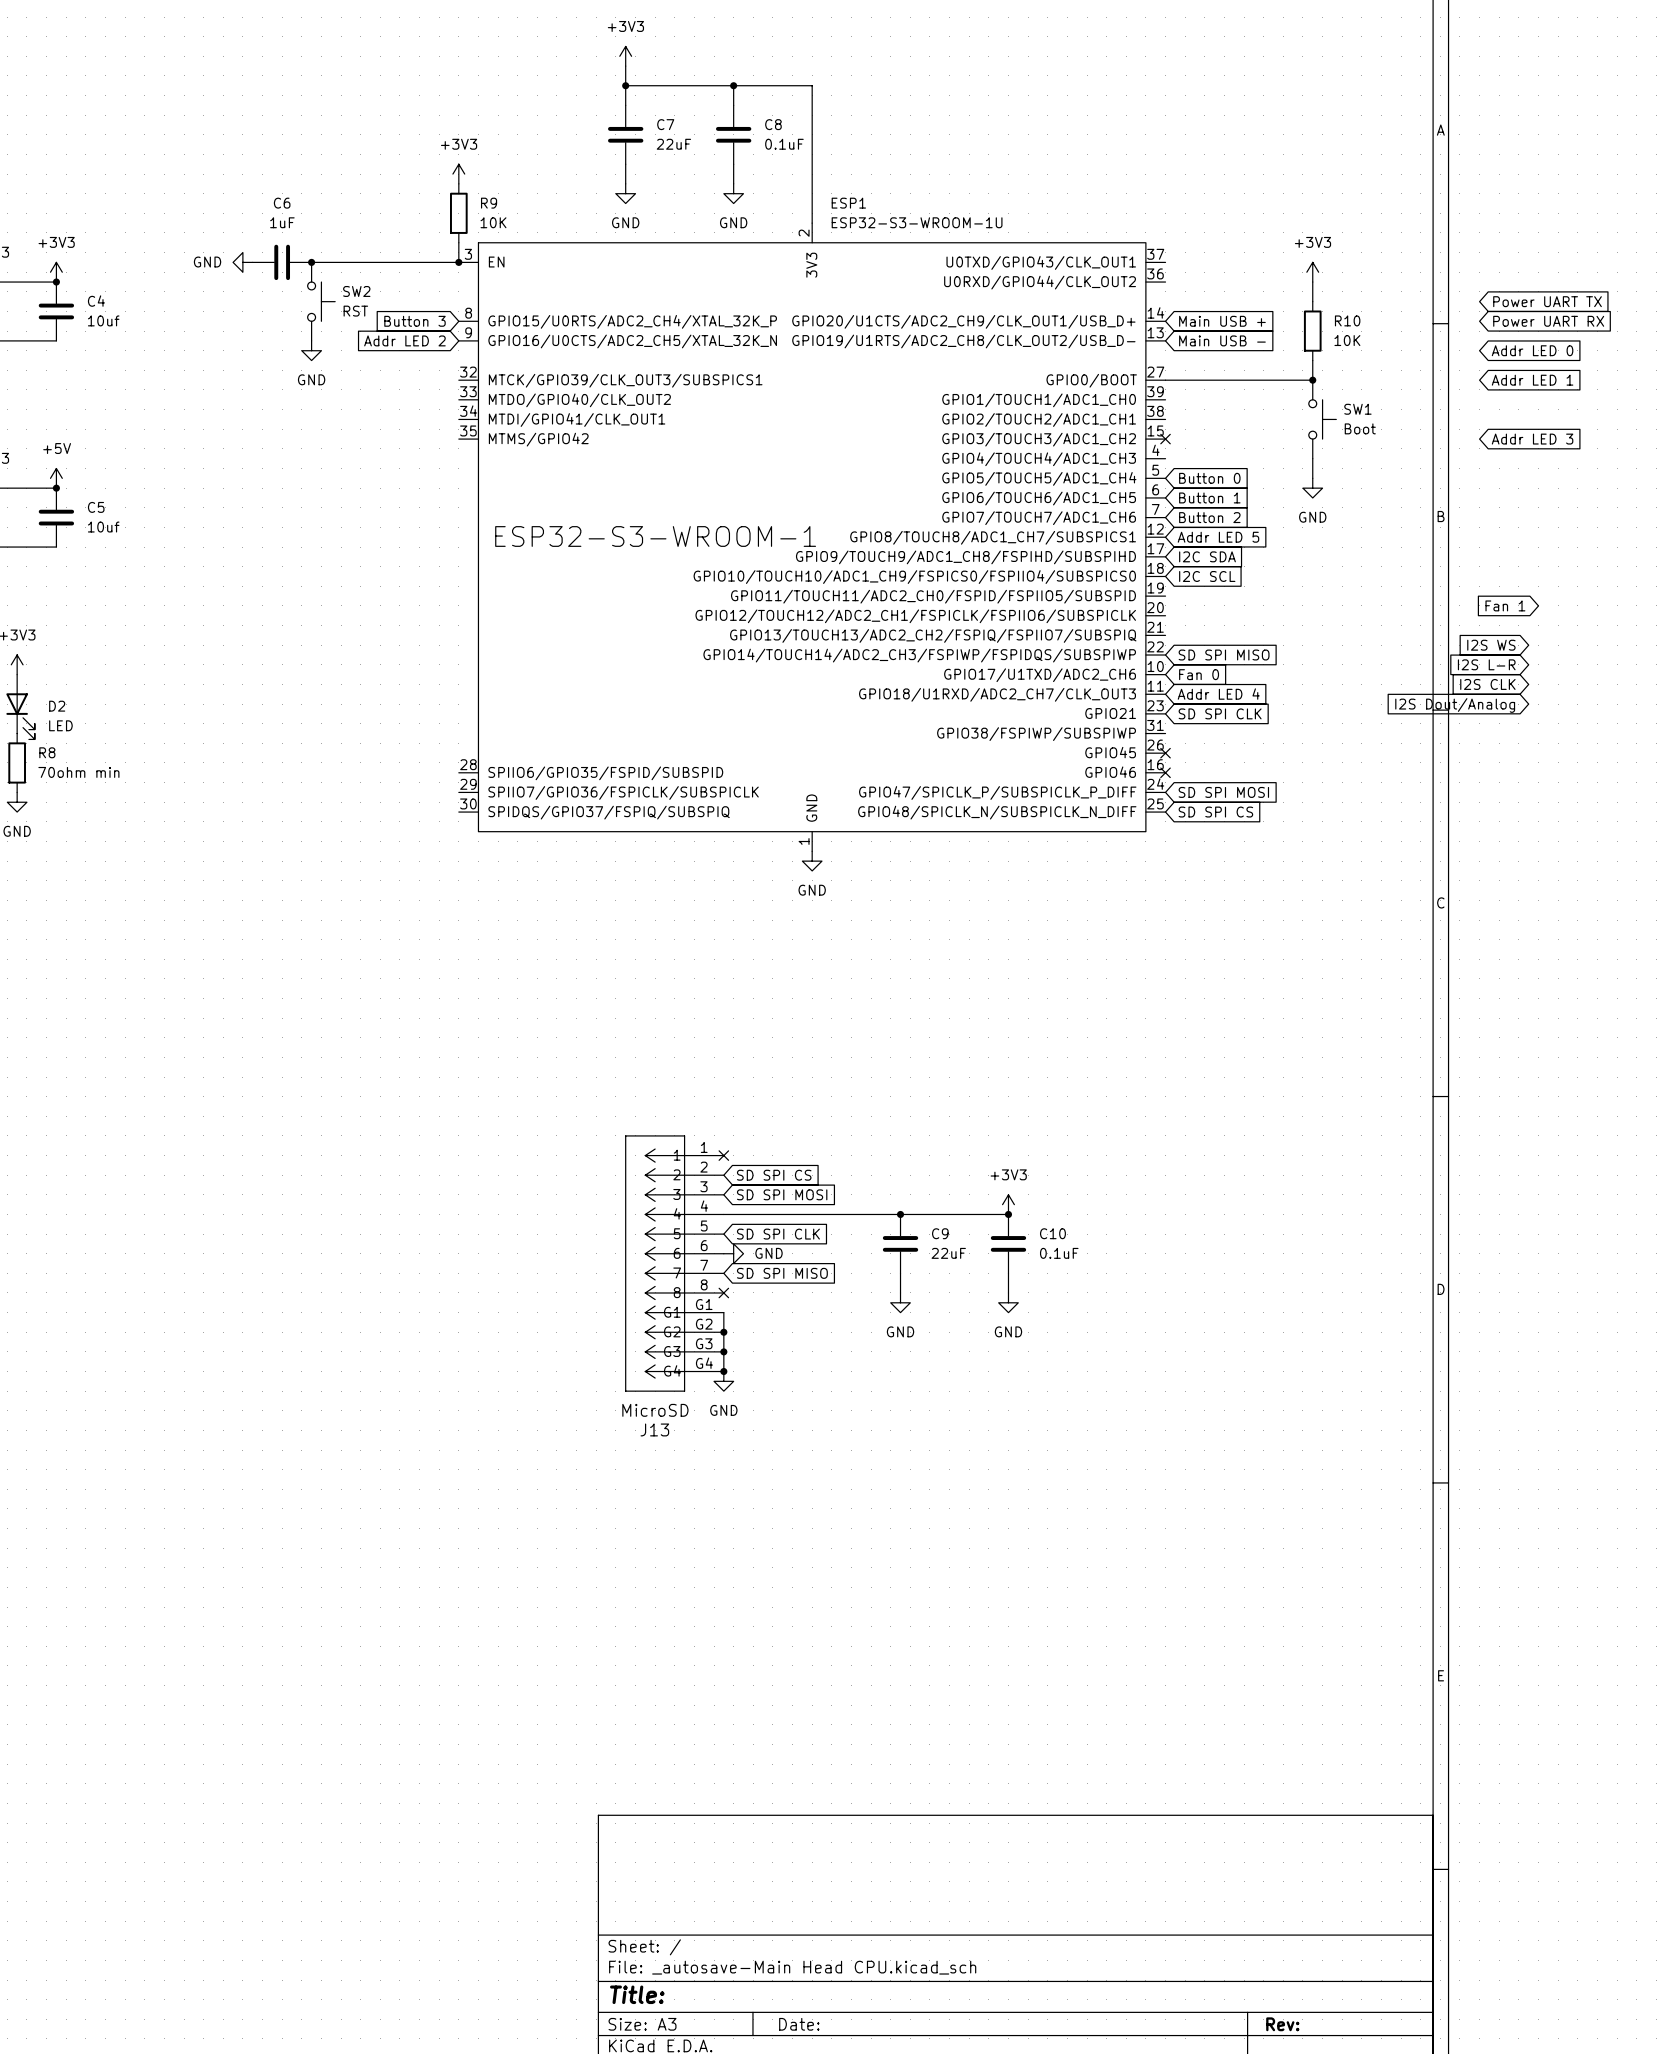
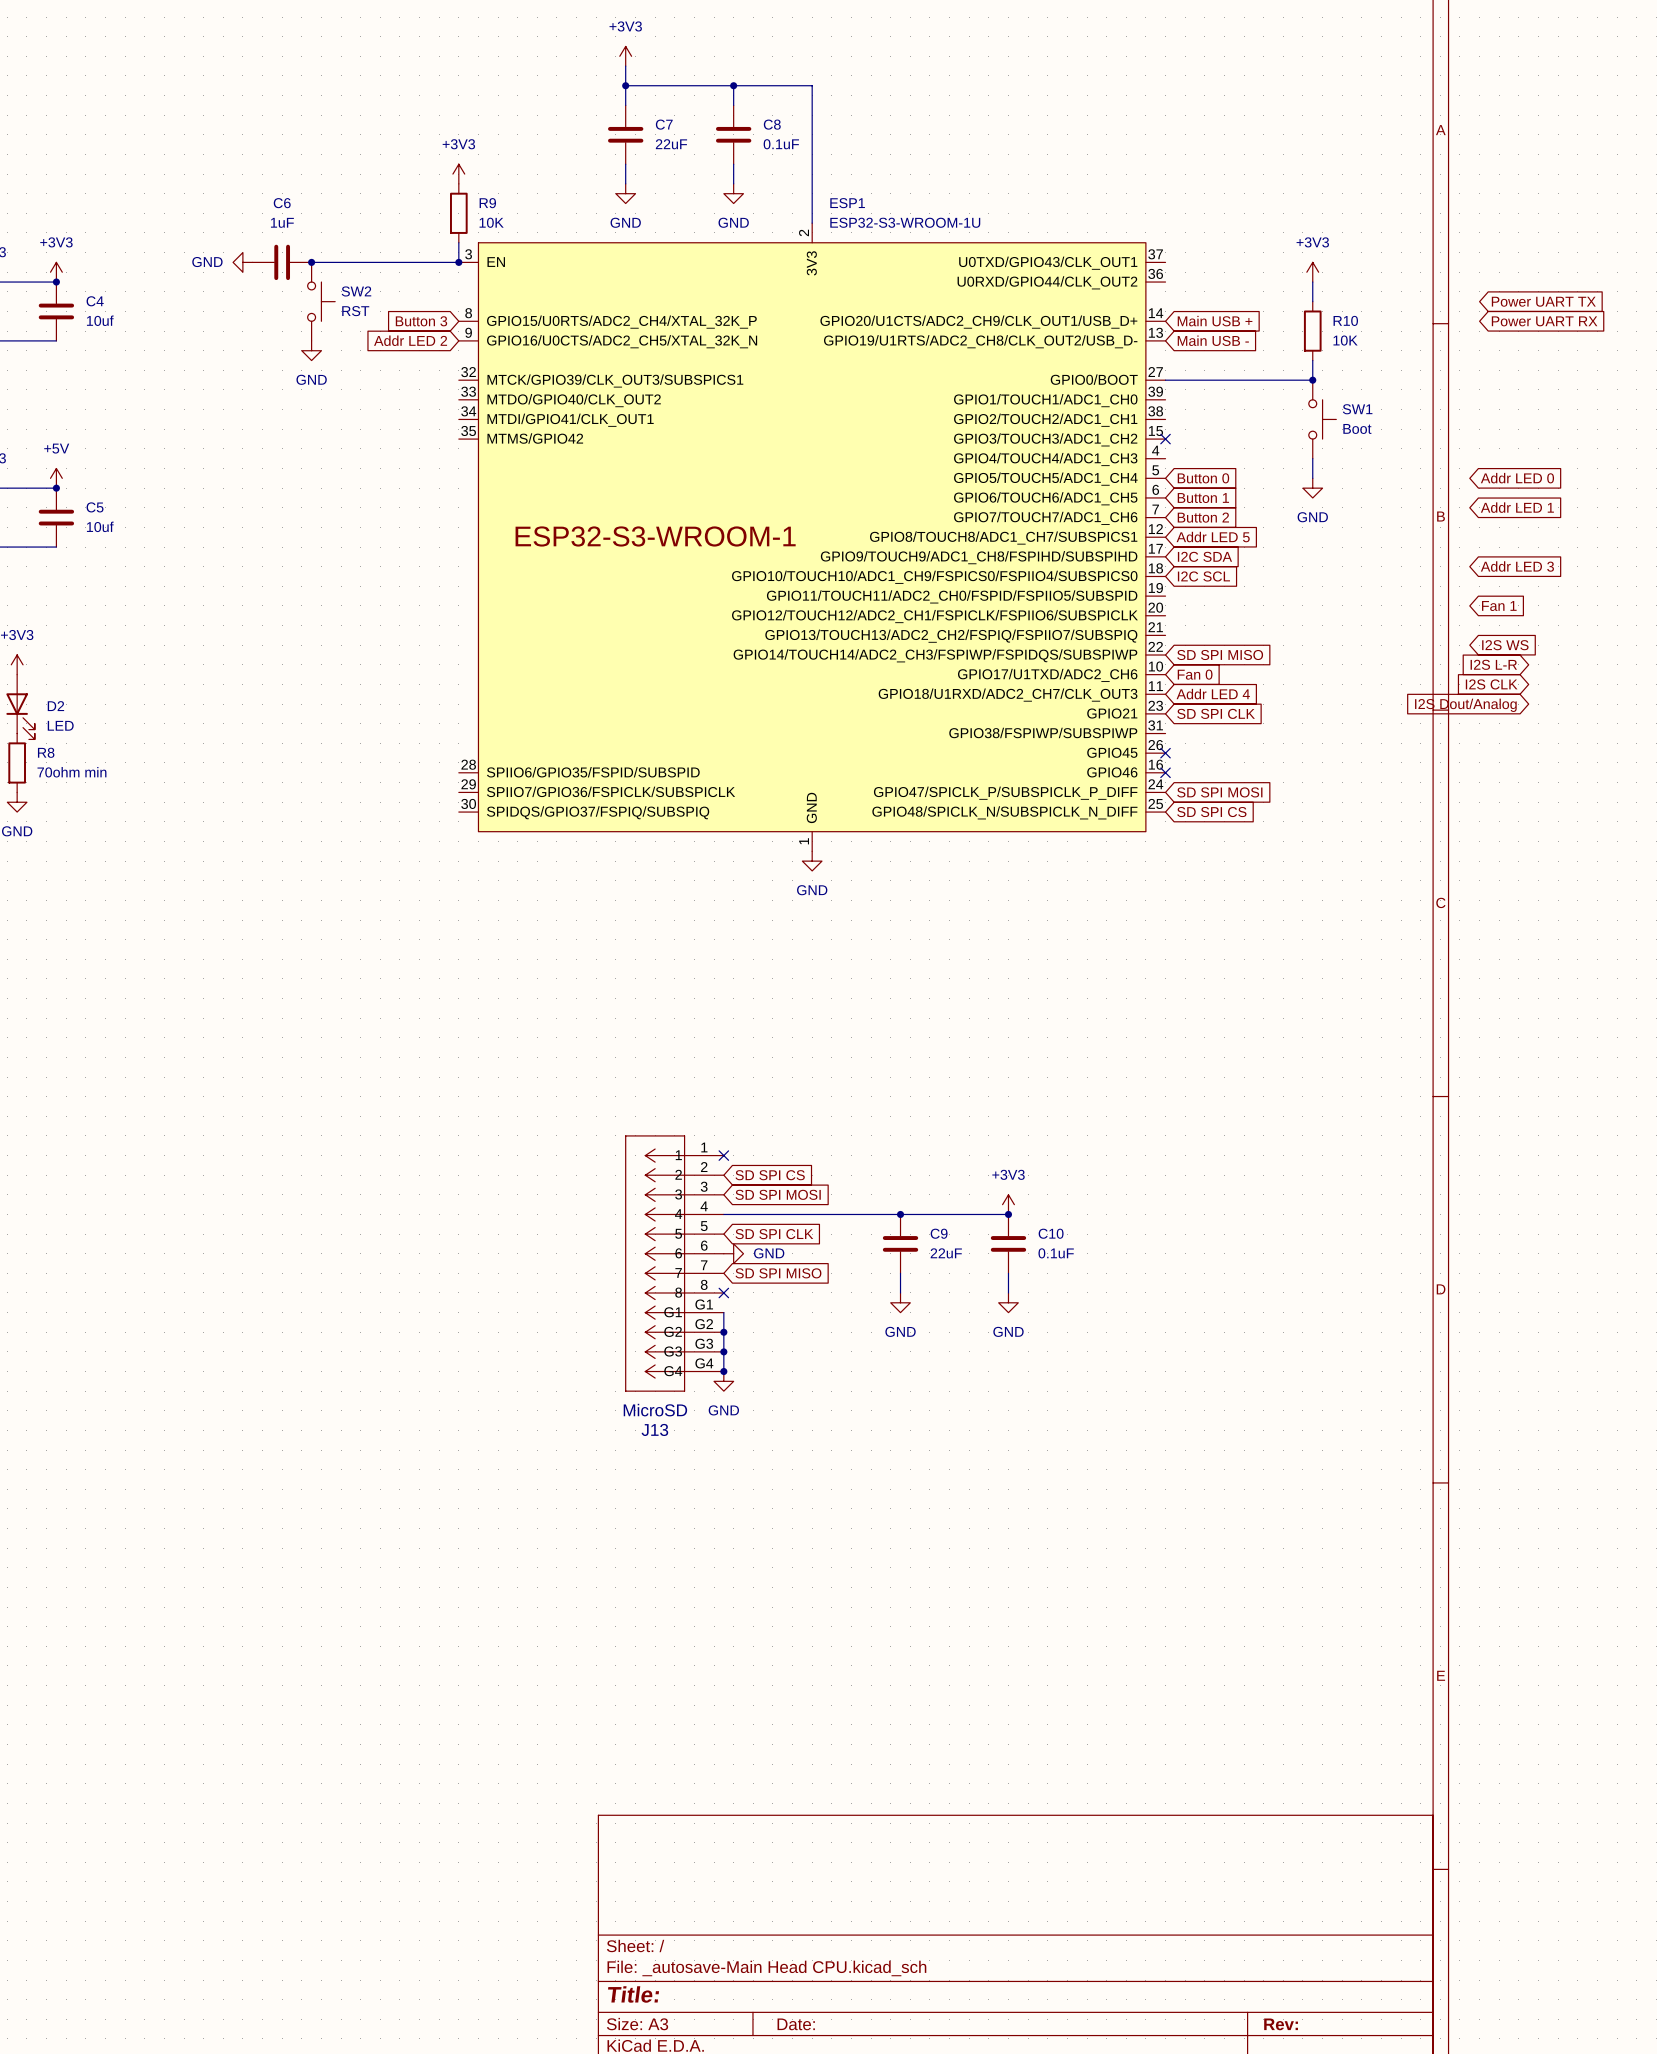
global label position: Addr LED 0 (1532, 350) -> Addr LED 0 (1517, 478)
global label position: Addr LED 1 (1532, 380) -> Addr LED 1 (1517, 507)
global label position: Addr LED 3 (1532, 439) -> Addr LED 3 (1517, 566)
global label rotation: 0° (1505, 605) -> 180° (1499, 606)
global label rotation: 0° (1491, 645) -> 180° (1505, 645)

